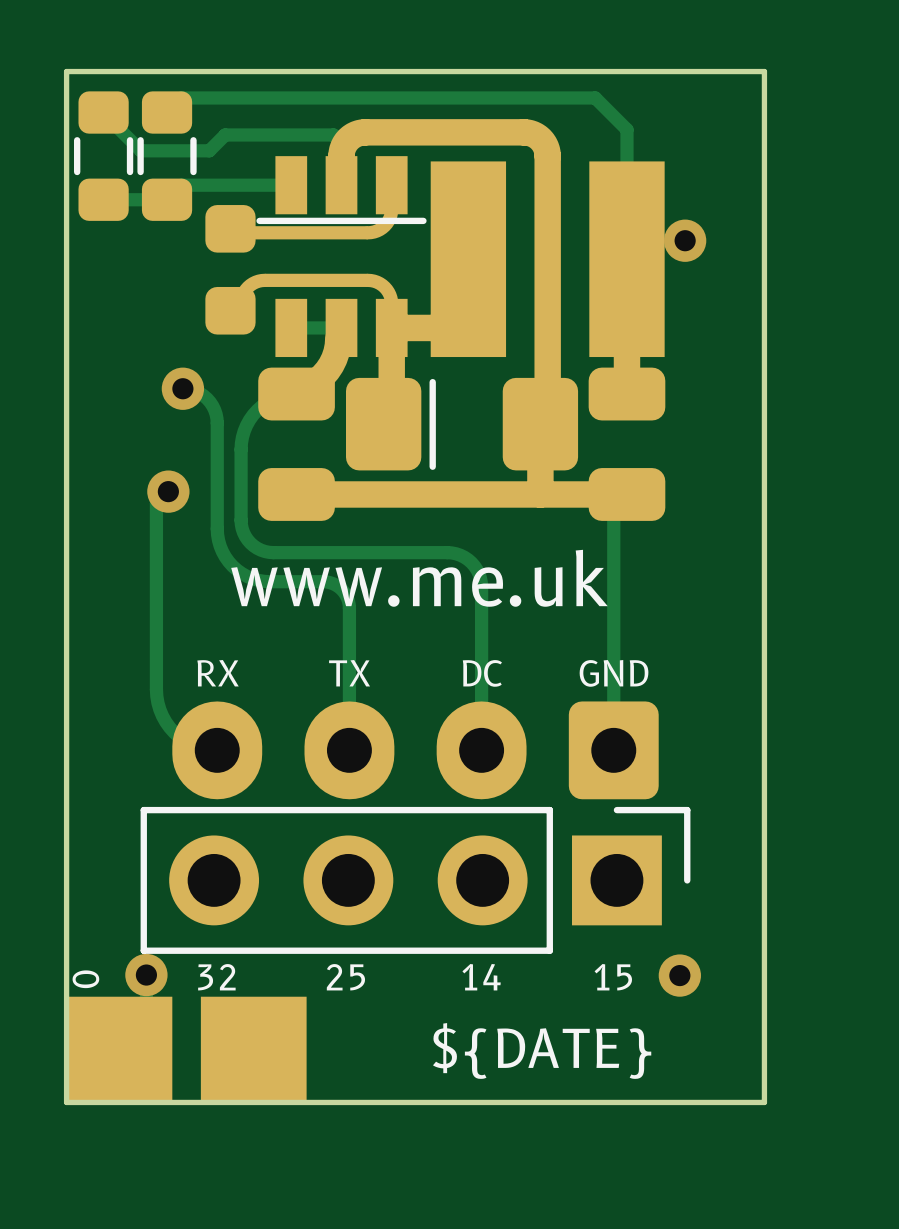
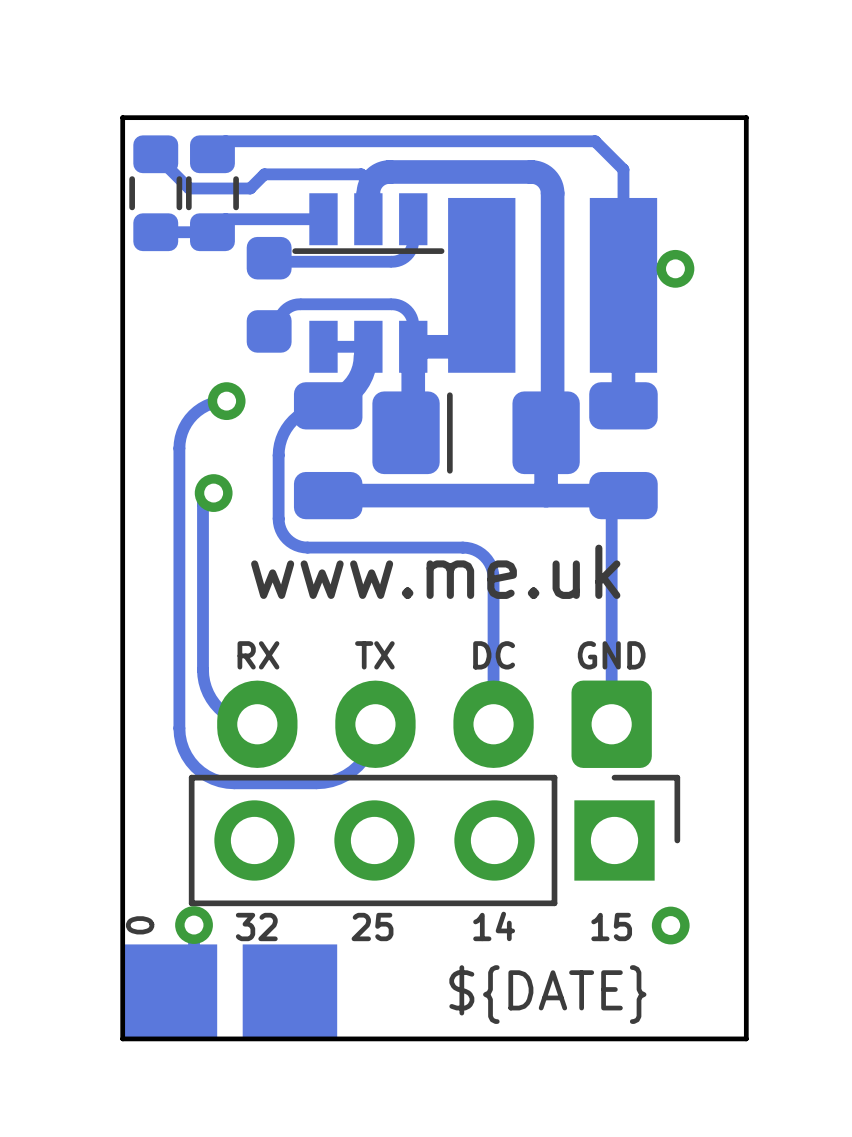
track: (182, 388) (196, 391) (203, 395) (212, 405) (216, 414) (217, 534) (222, 551) (228, 561) (242, 573) (258, 580) (329, 582) (341, 589) (347, 598) (349, 608) (349, 750) -> (226, 401) (206, 405) (193, 414) (184, 427) (179, 443) (179, 728) (183, 749) (195, 767) (206, 775) (220, 781) (234, 783) (324, 782) (345, 775) (363, 760) (373, 739) (375, 724)

